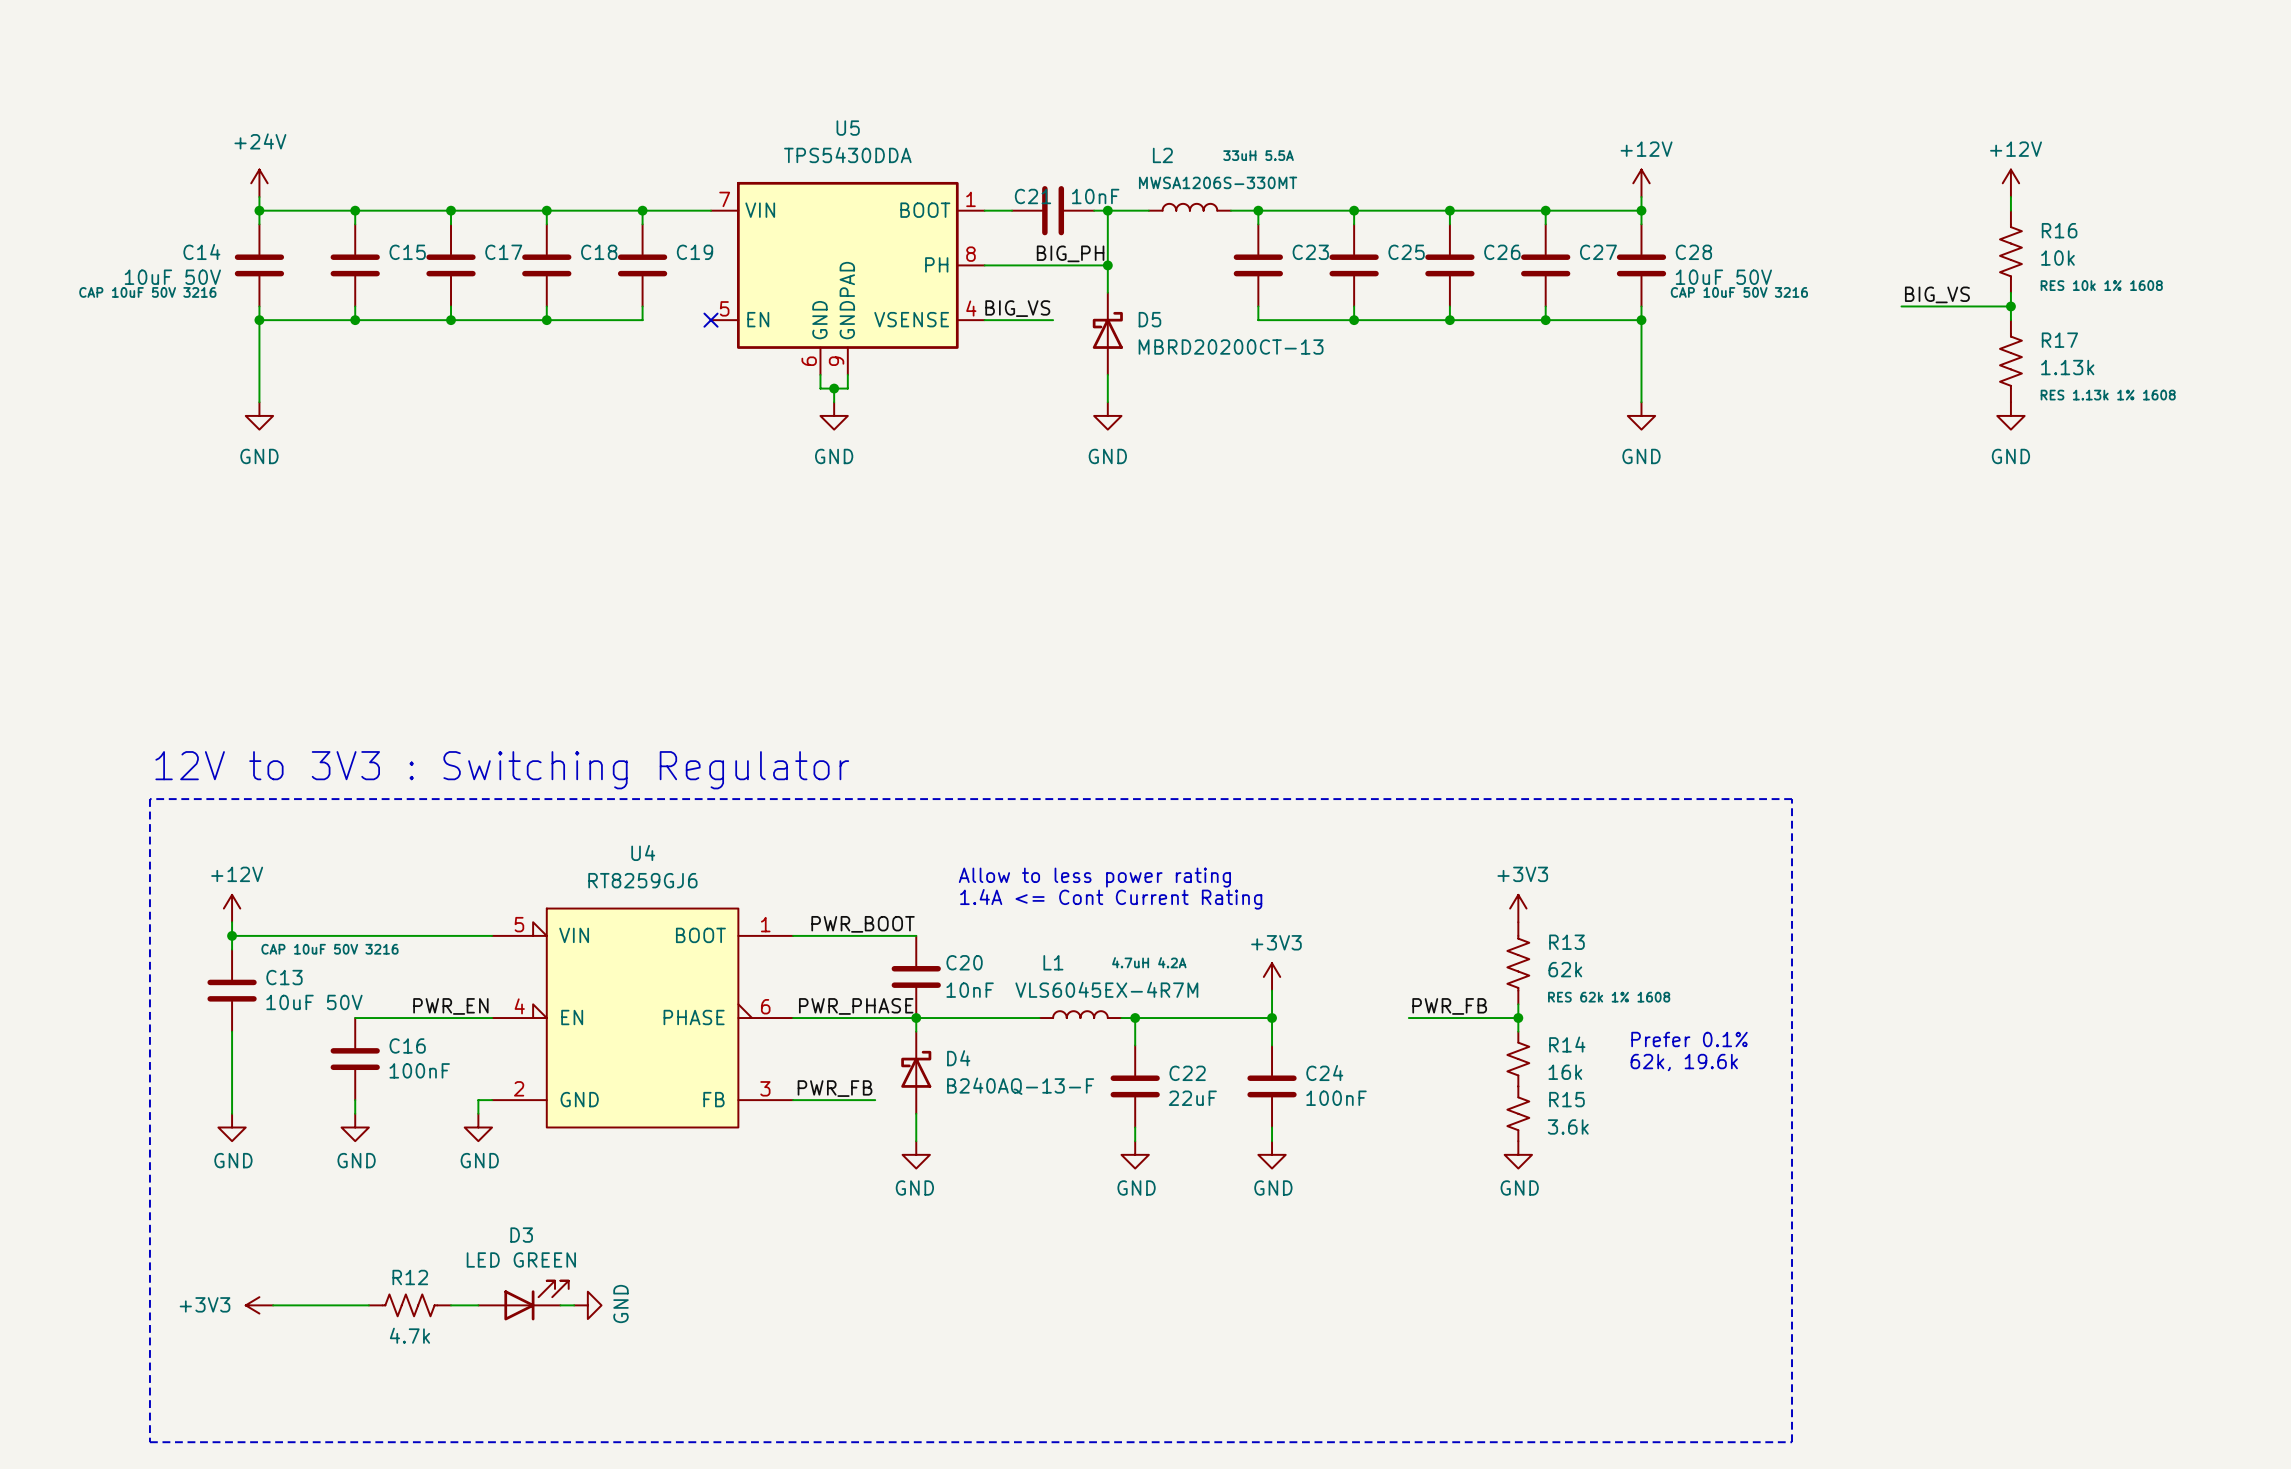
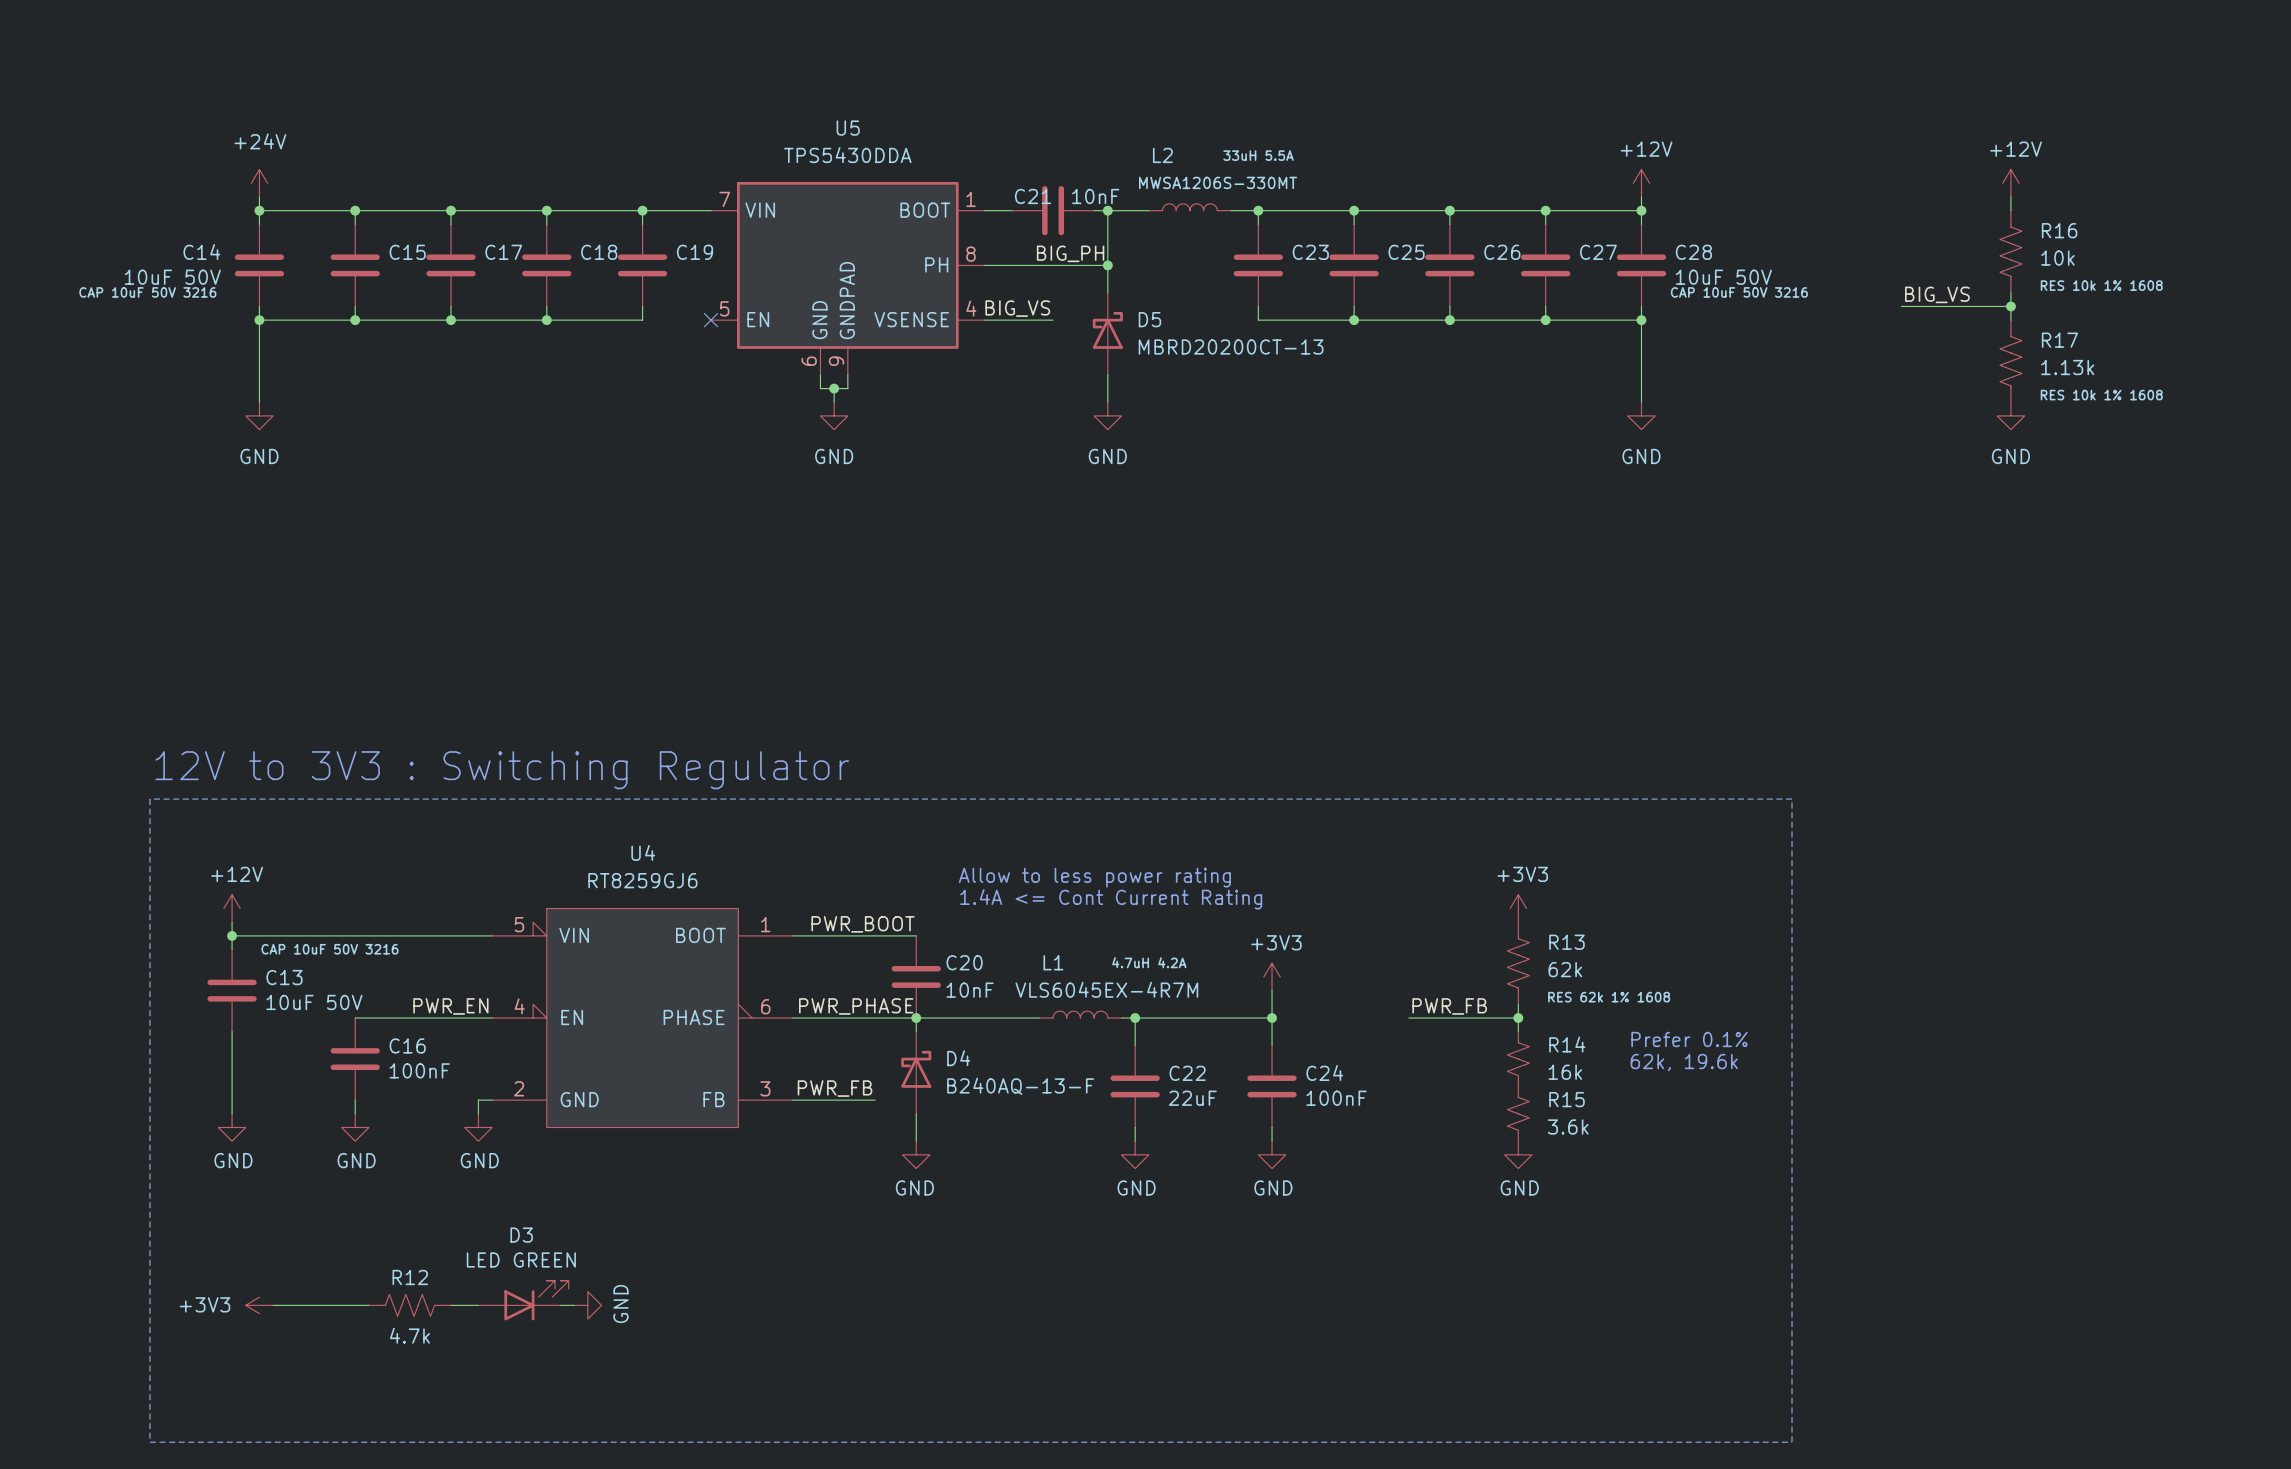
R17 text: RES 1.13k 1% 1608 (2108, 395) -> RES 10k 1% 1608 (2101, 395)

